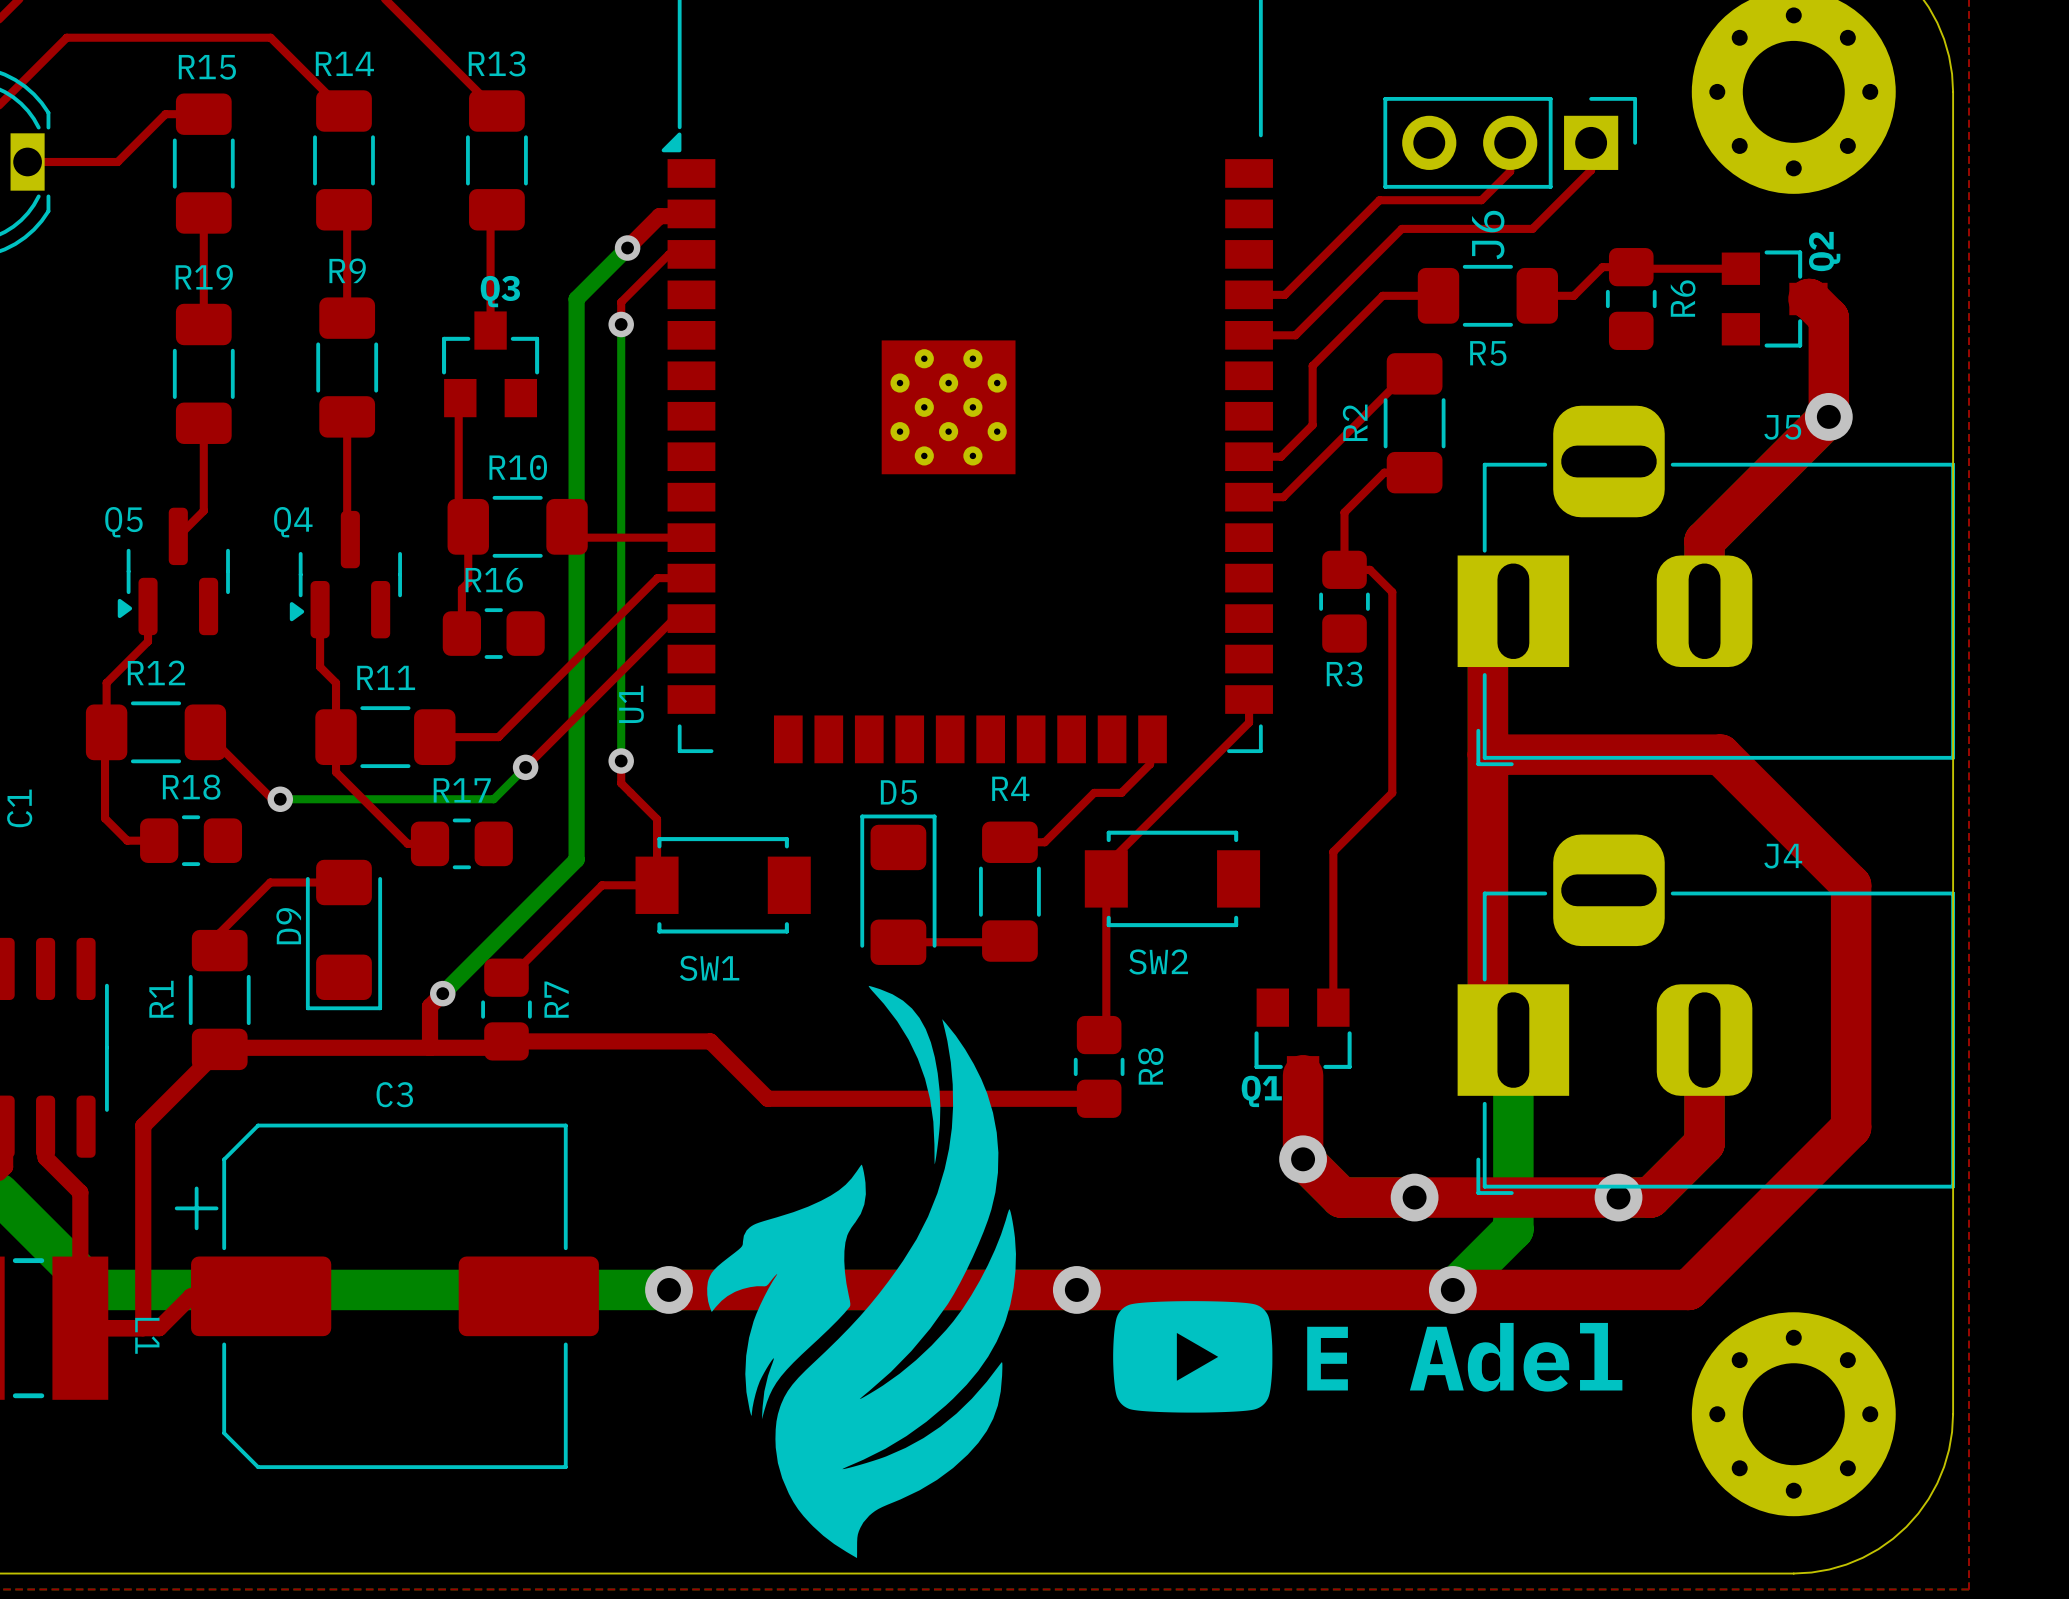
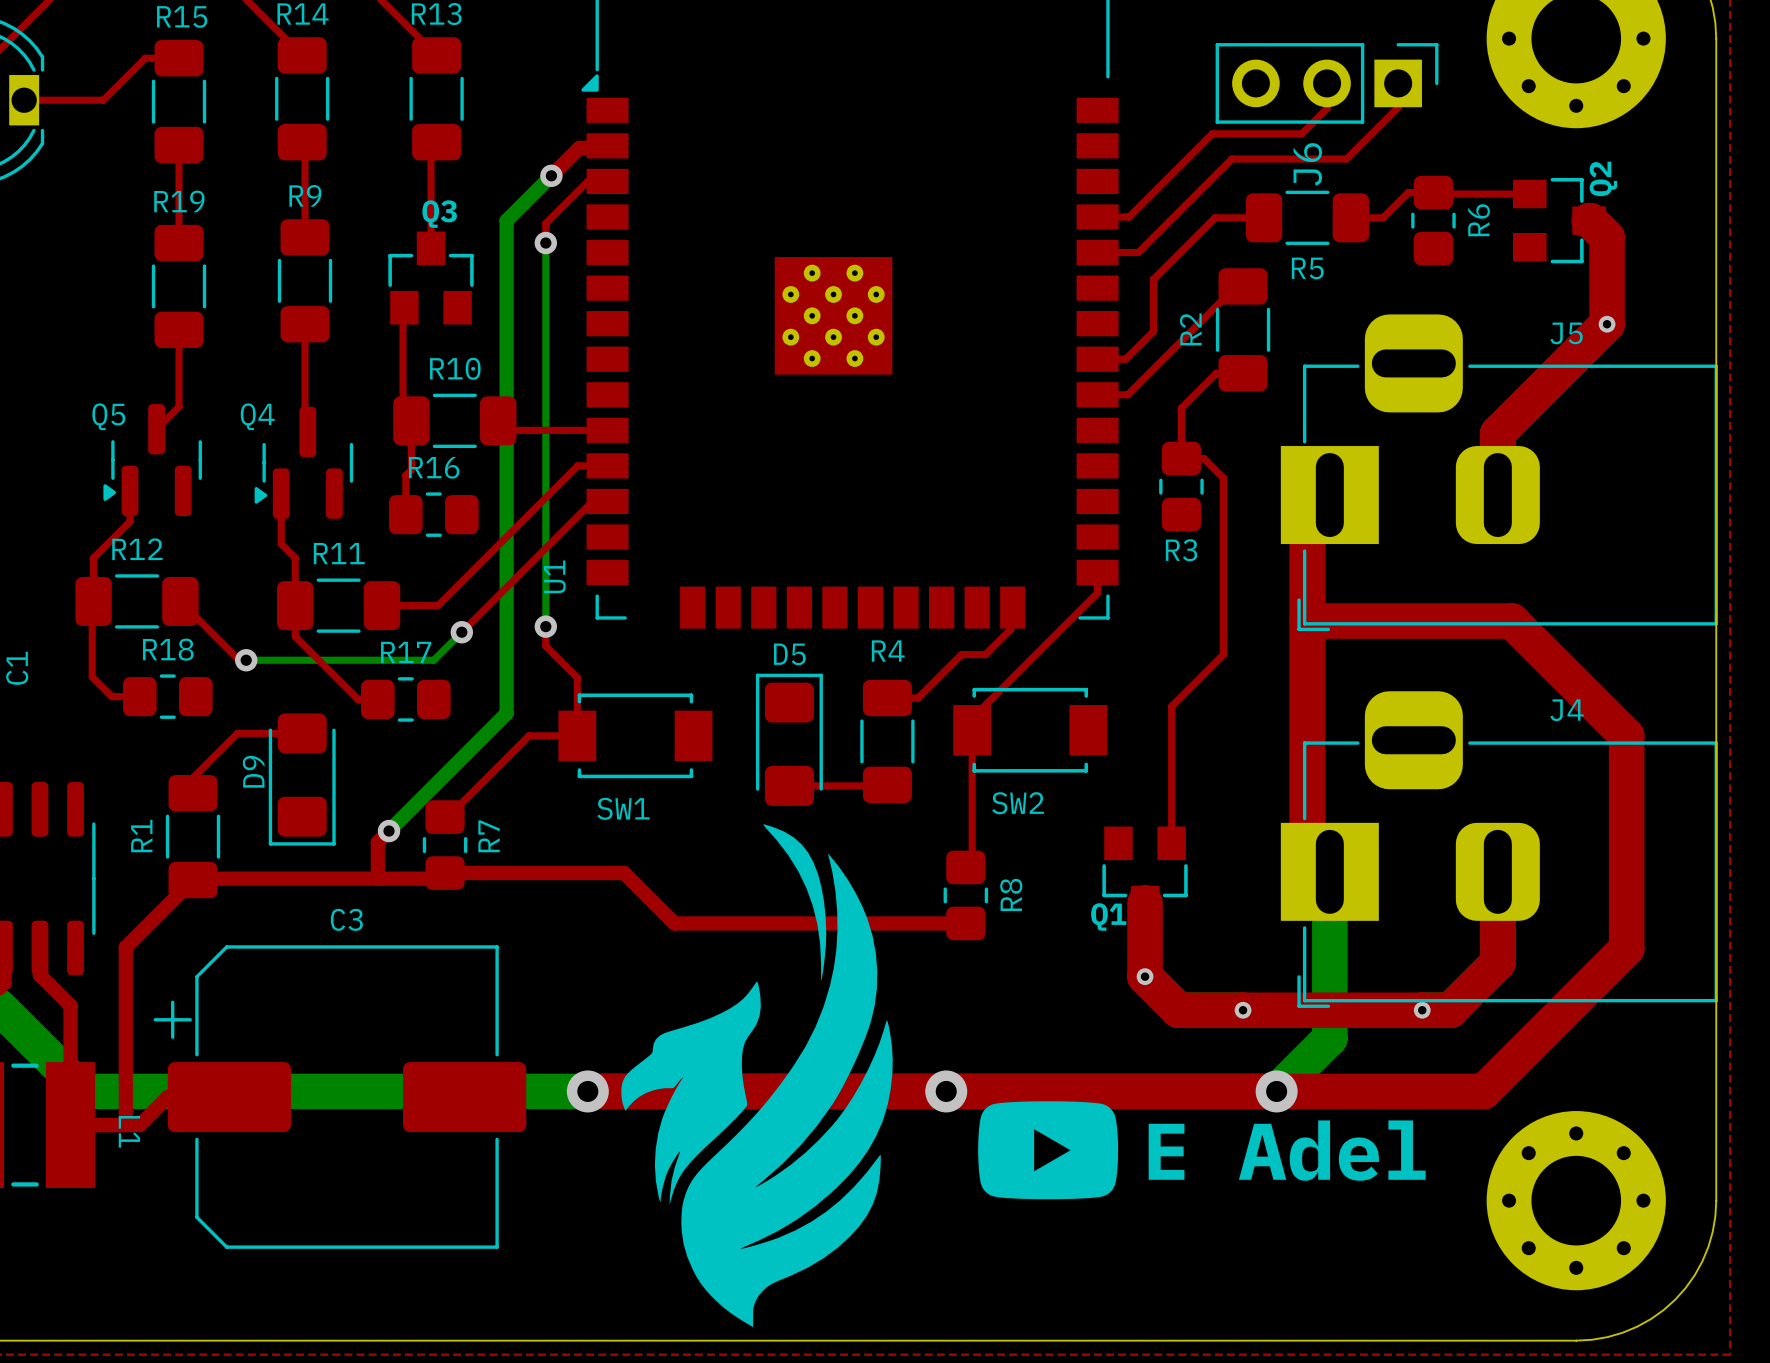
via size: [1804, 393, 1853, 441] -> [1598, 315, 1616, 333]
via size: [1279, 1135, 1327, 1184] -> [1136, 968, 1154, 986]
via size: [1390, 1173, 1439, 1222] -> [1234, 1001, 1252, 1019]
via size: [1594, 1173, 1643, 1222] -> [1413, 1001, 1431, 1019]

